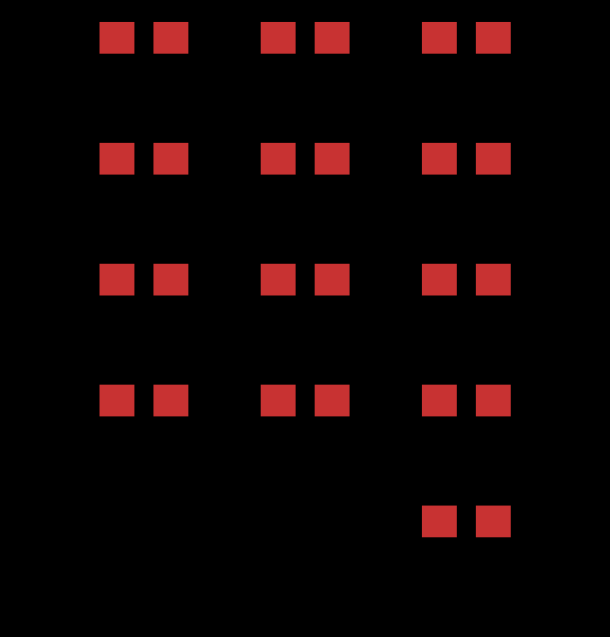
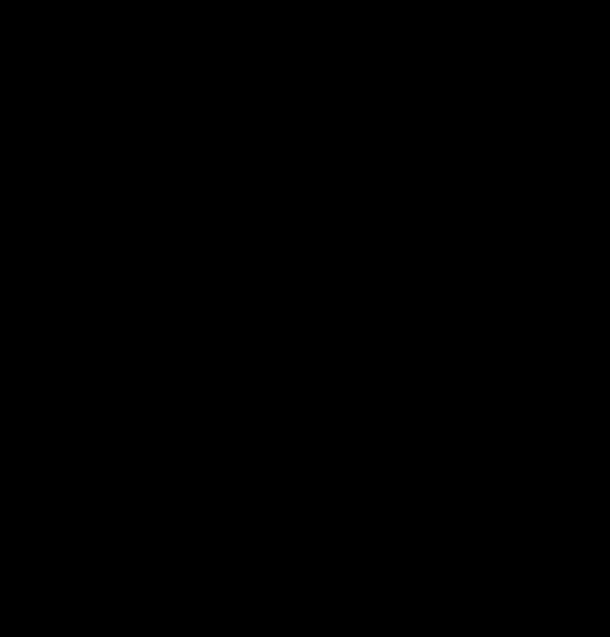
part: (143, 37) -> none
part: (305, 37) -> none
part: (466, 37) -> none
part: (143, 158) -> none
part: (305, 158) -> none
part: (466, 158) -> none
part: (143, 279) -> none
part: (305, 279) -> none
part: (466, 279) -> none
part: (143, 400) -> none
part: (305, 400) -> none
part: (466, 400) -> none
part: (466, 521) -> none

